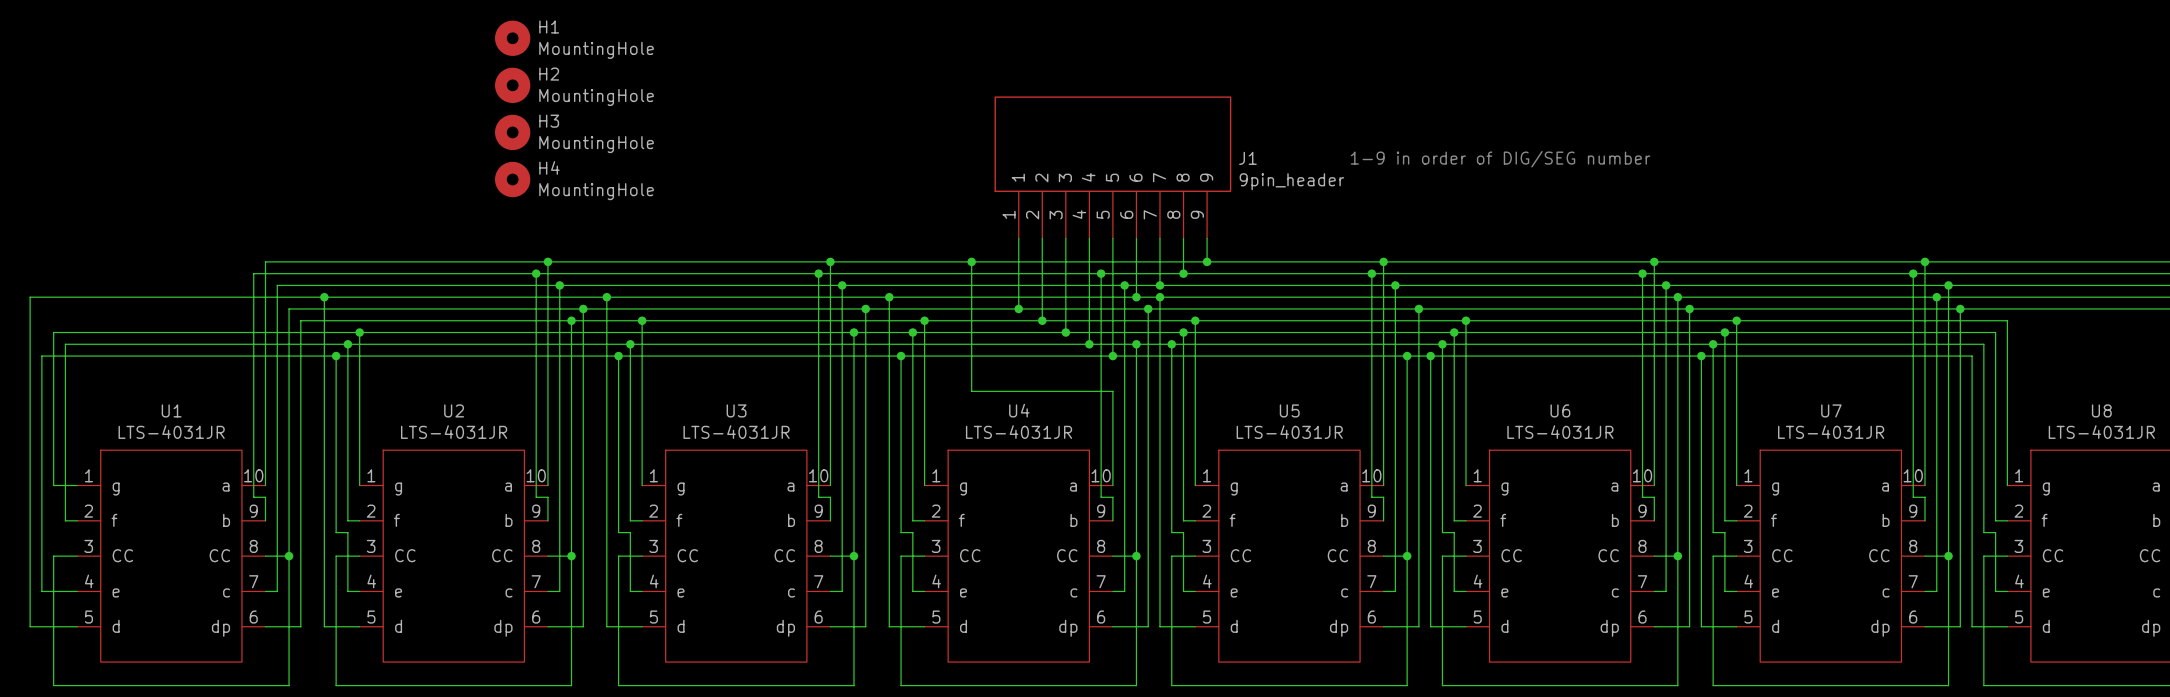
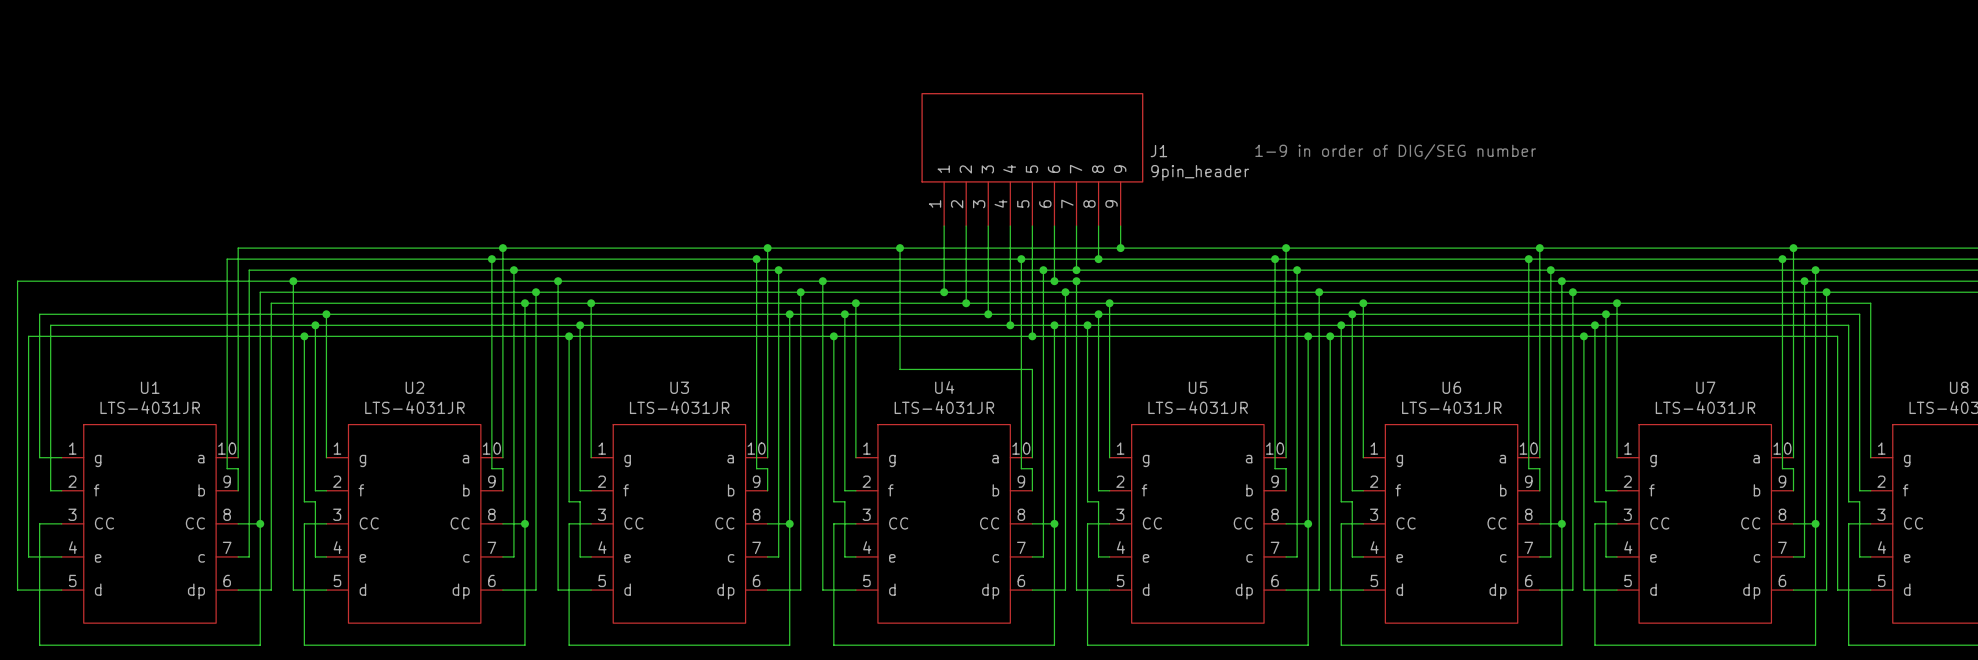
H1: MountingHole (512, 38) -> none
H2: MountingHole (512, 85) -> none
H3: MountingHole (512, 132) -> none
H4: MountingHole (512, 179) -> none

